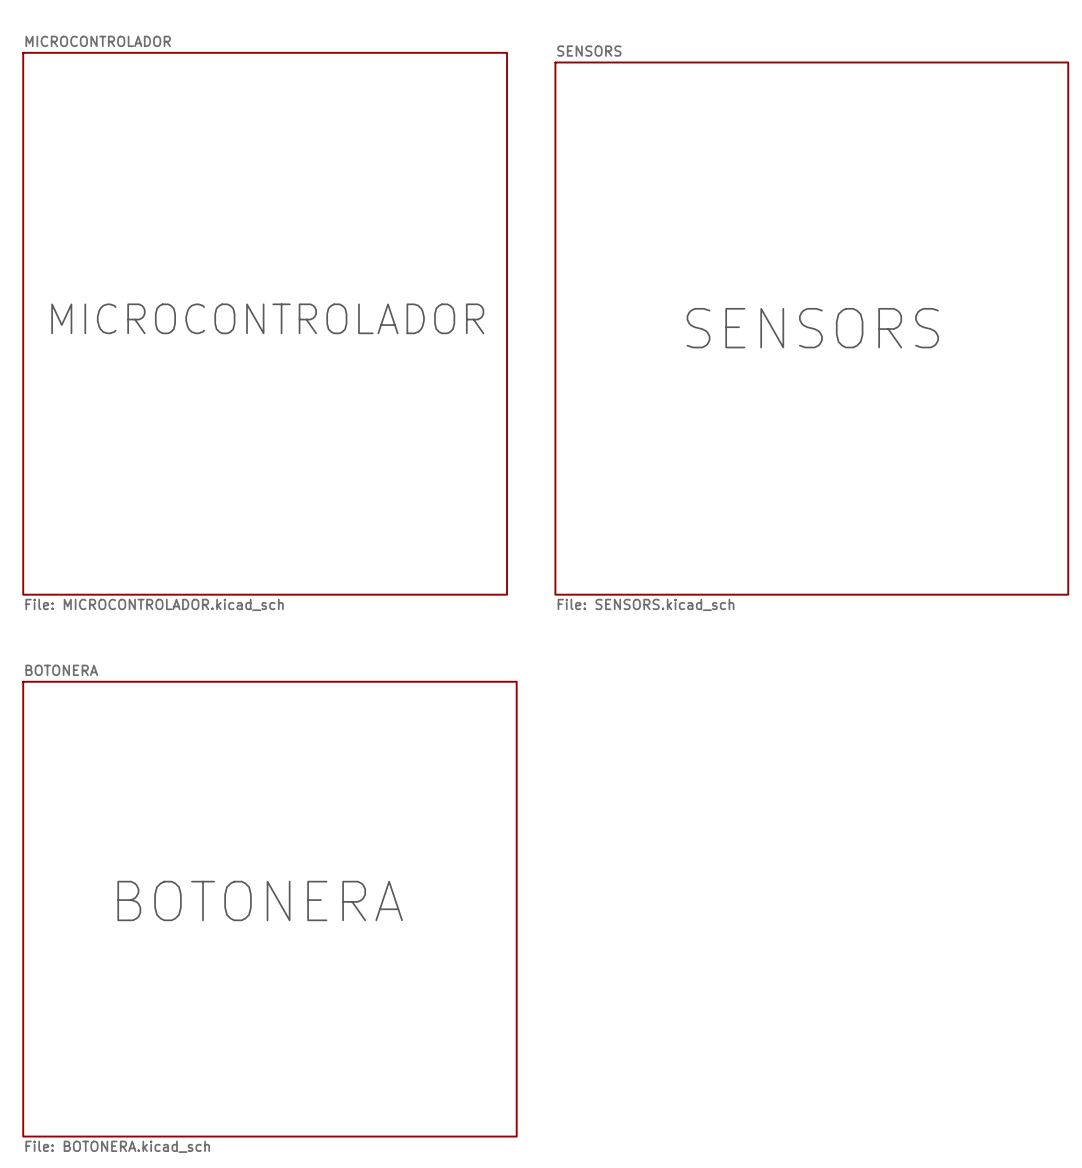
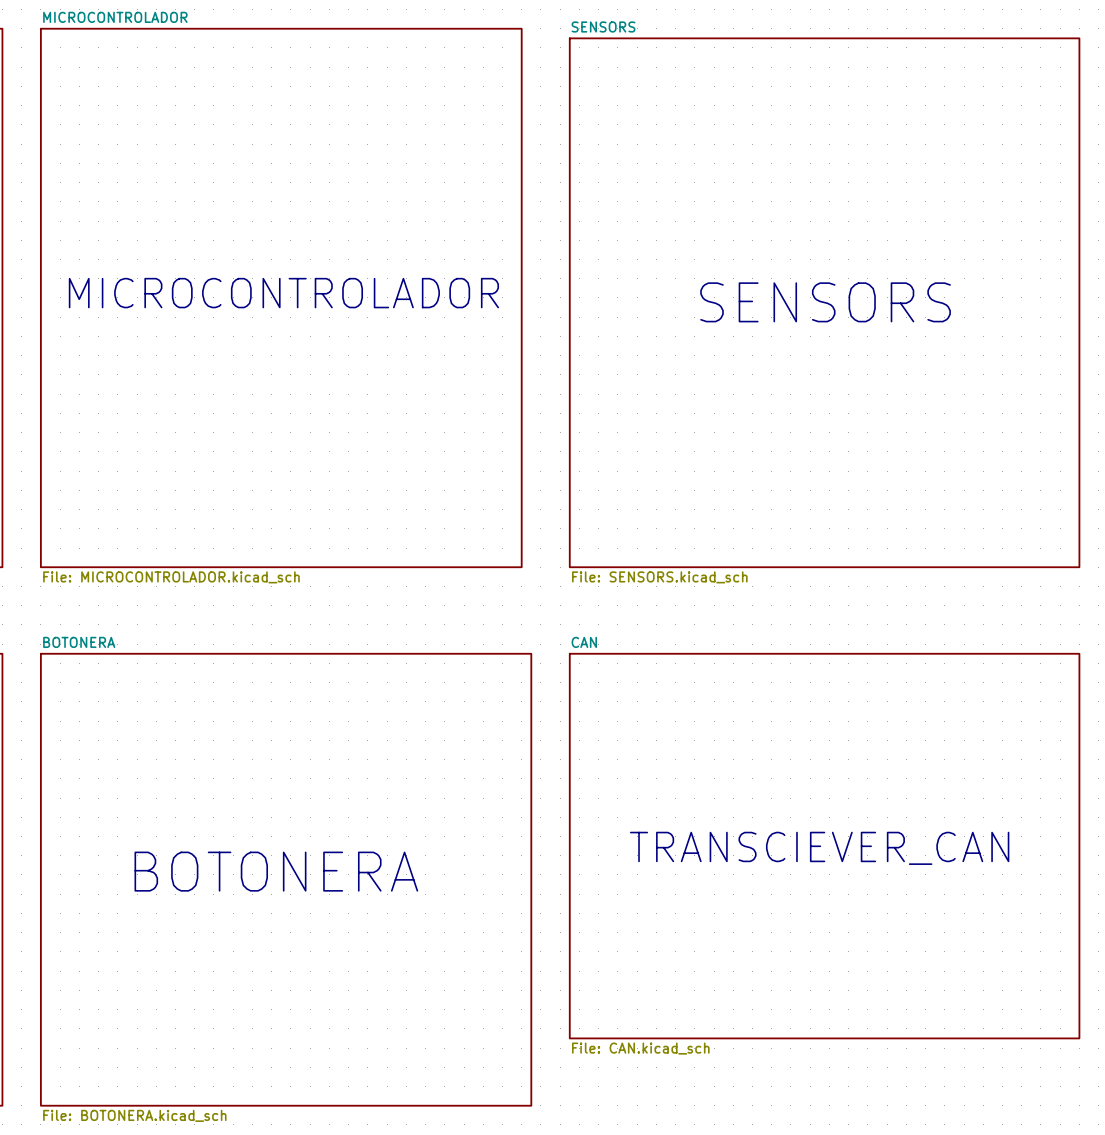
sheet CAN: none -> File: CAN.kicad_sch (824, 846)
text: none -> TRANSCIEVER_CAN (819, 848)

